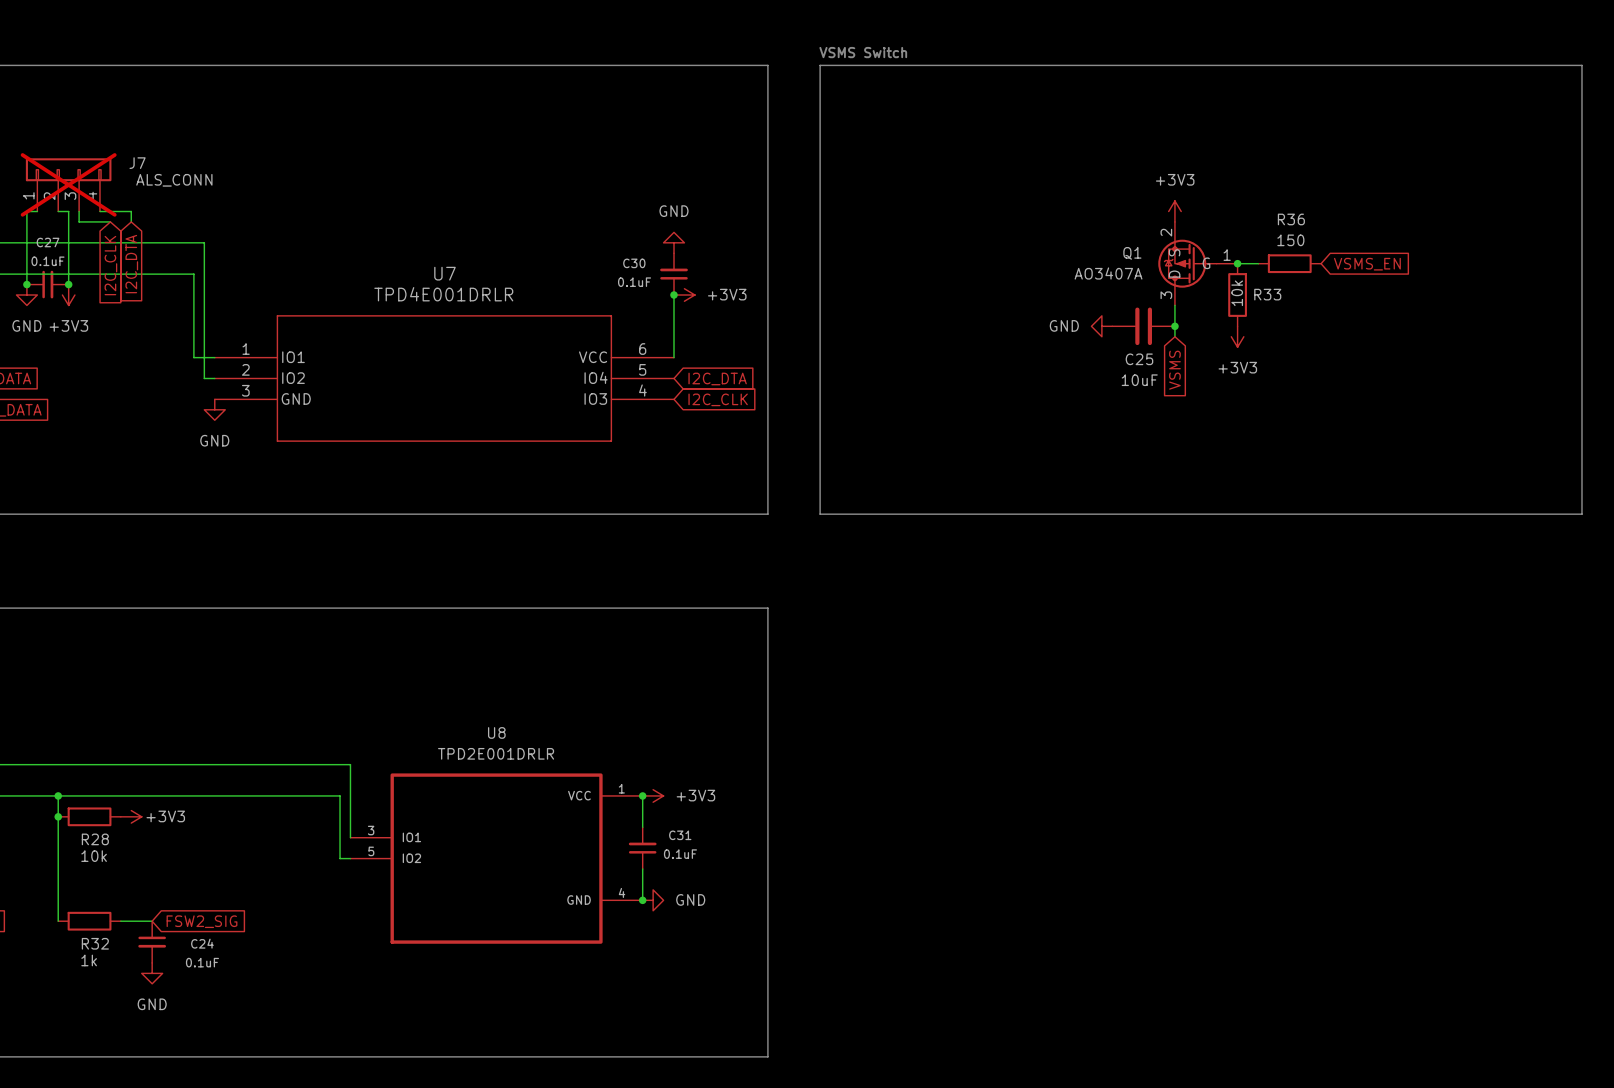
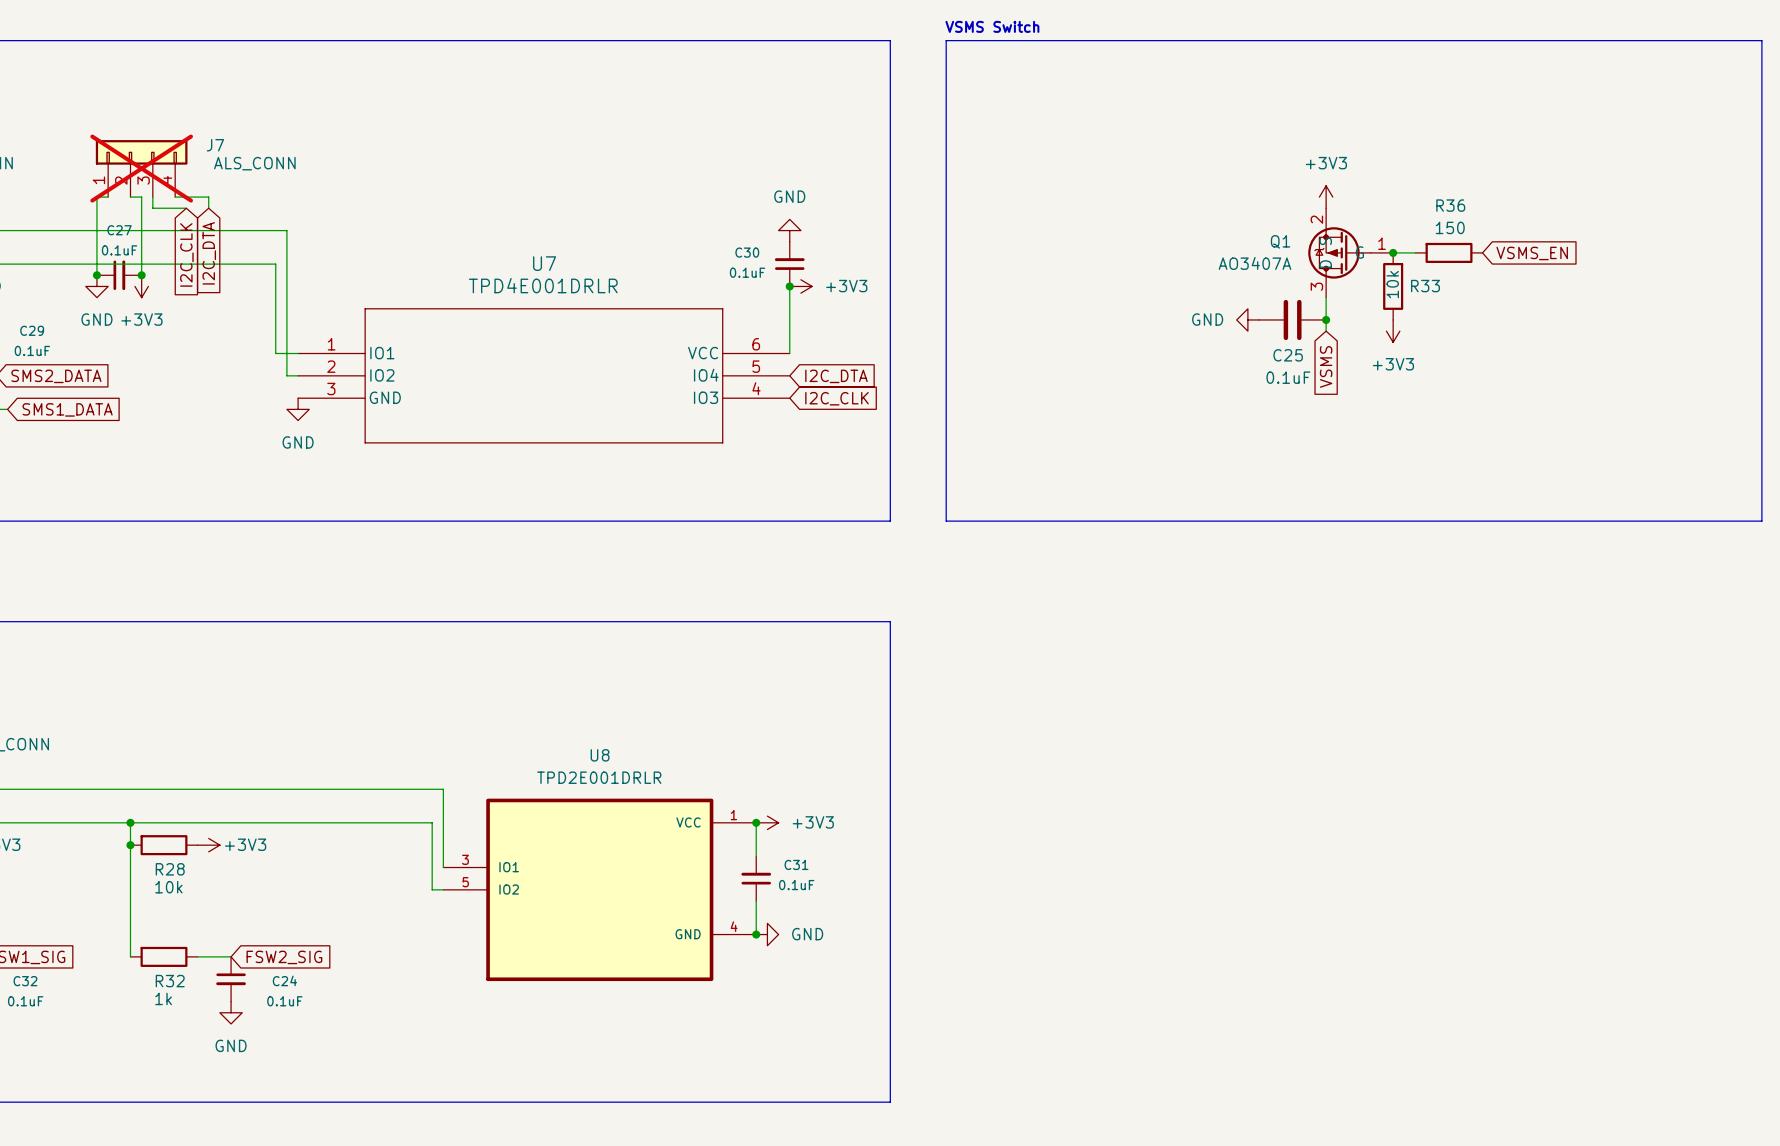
C25 value: 10uF (1139, 380) -> 0.1uF (1288, 377)

